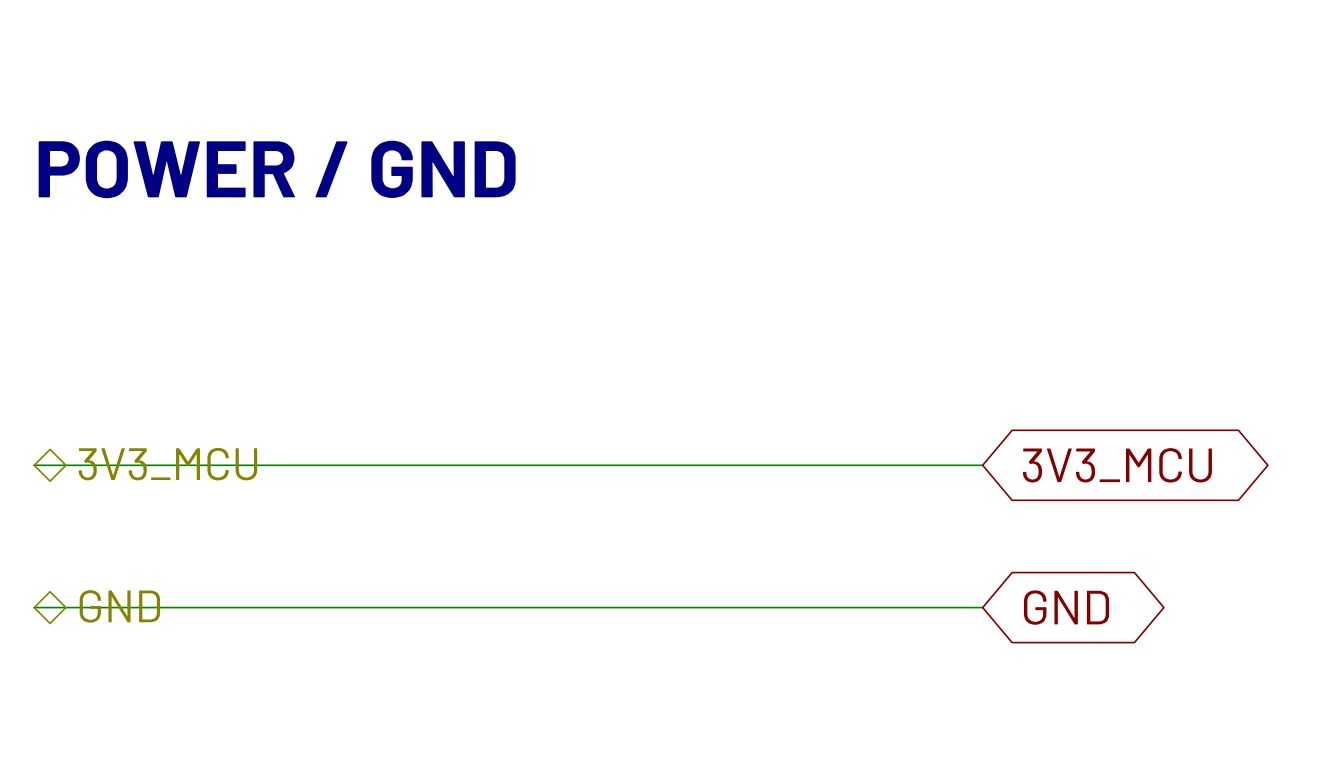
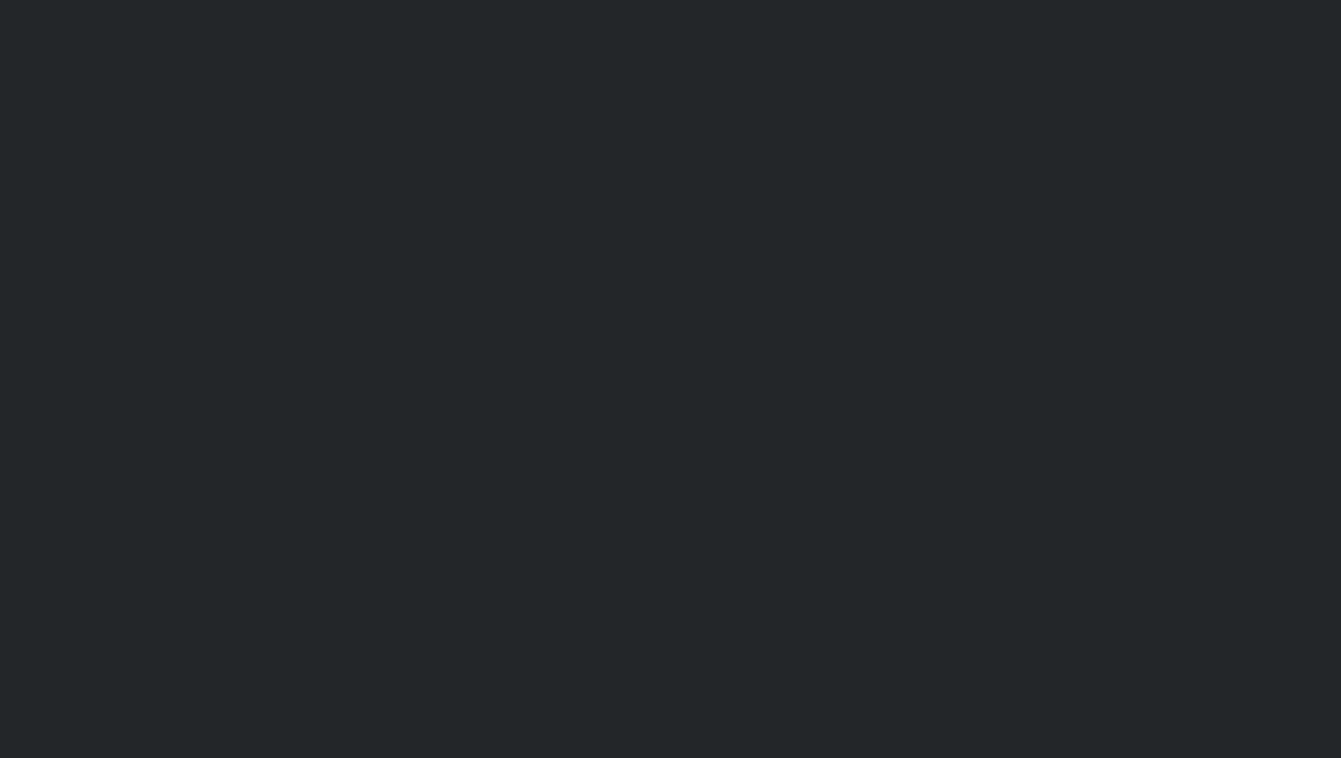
text: POWER / GND (277, 169) -> none
hierarchical label: 3V3_MCU (167, 464) -> none
wire: (34, 465) (982, 465) -> none
global label: 3V3_MCU (1117, 465) -> none
hierarchical label: GND (119, 606) -> none
wire: (34, 607) (982, 607) -> none
global label: GND (1066, 607) -> none

